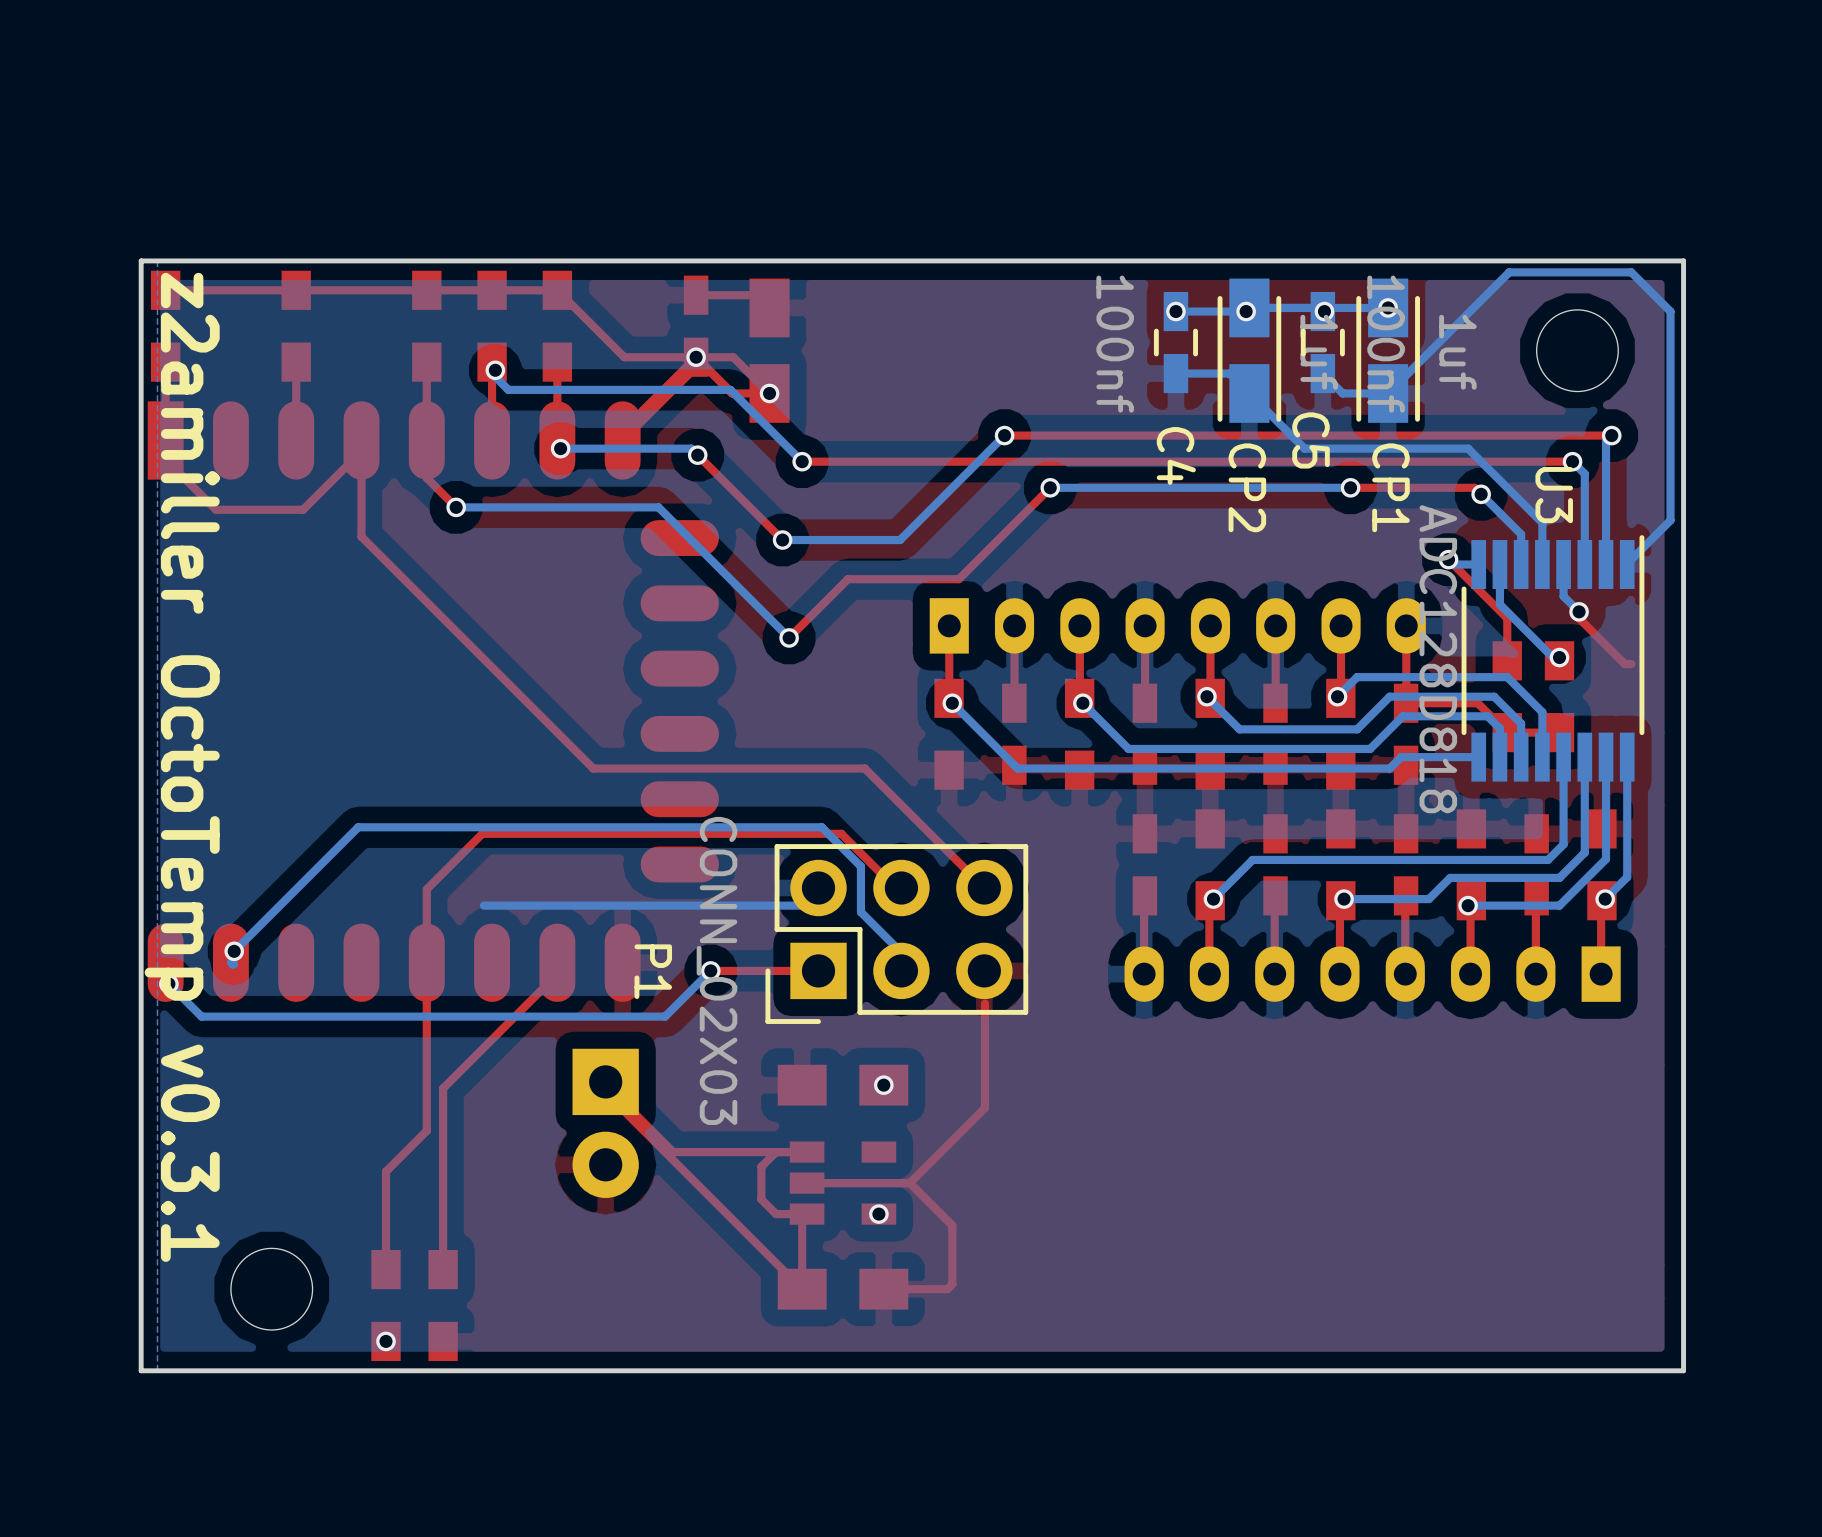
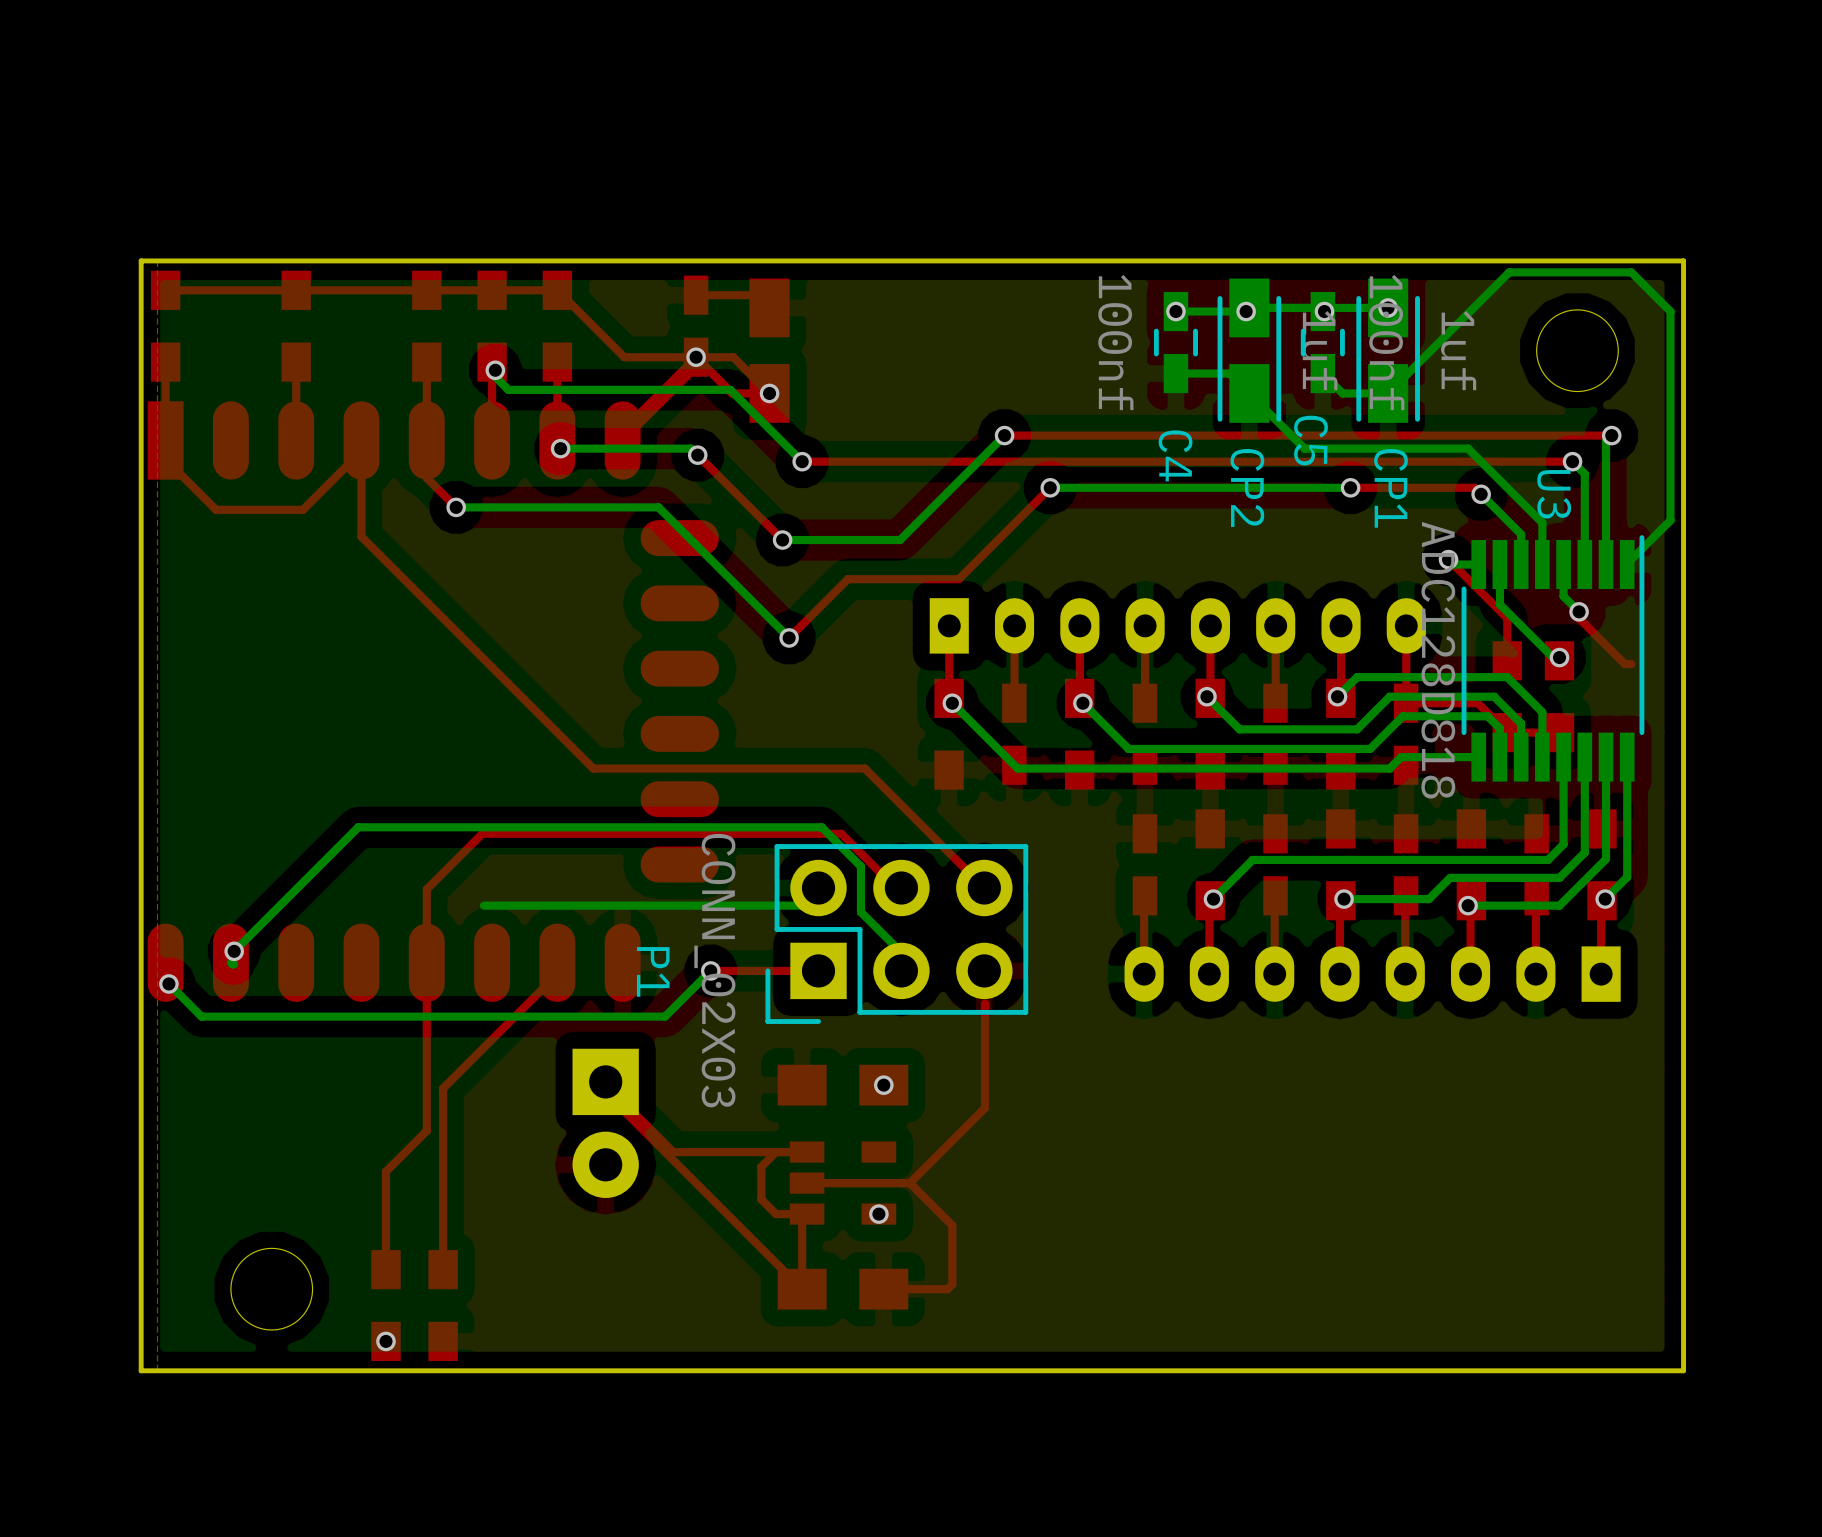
text: z2amiller OctoTemp v0.3.1 (182, 767) -> none

